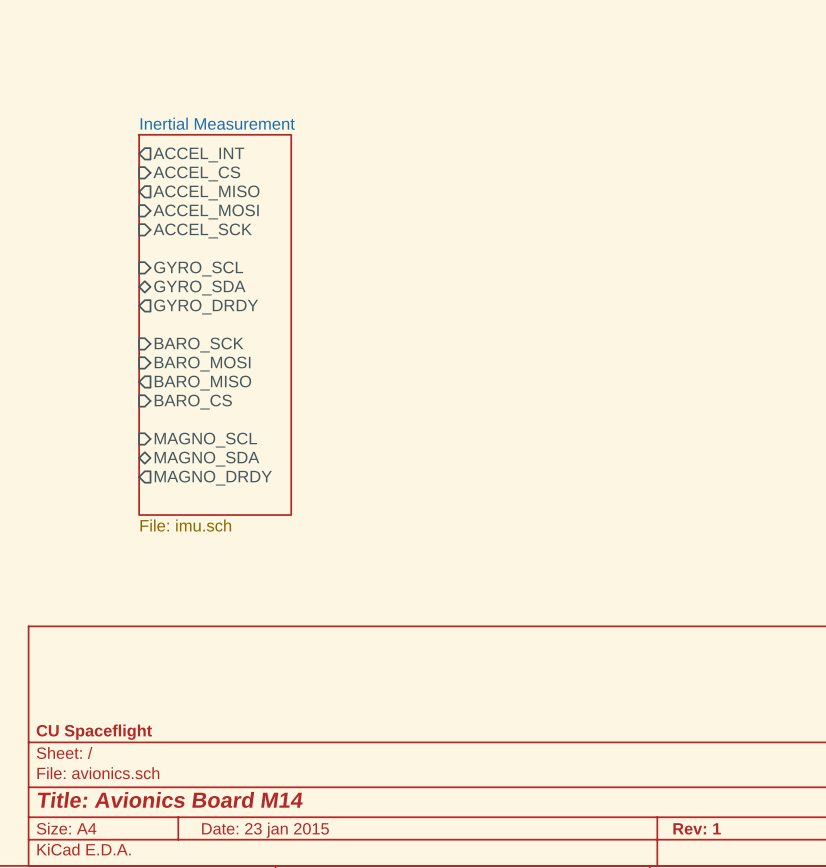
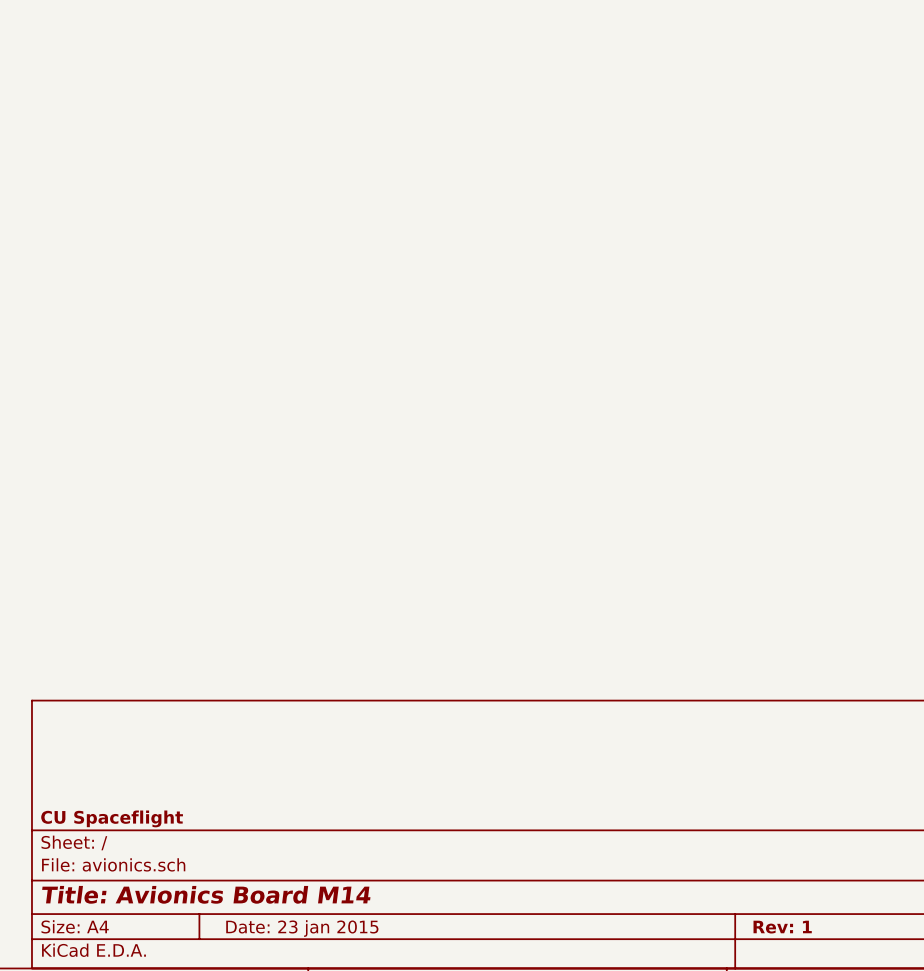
sheet pin: ACCEL_INT (198, 154) -> none
sheet pin: ACCEL_CS (196, 173) -> none
sheet pin: ACCEL_MISO (206, 192) -> none
sheet pin: ACCEL_MOSI (206, 211) -> none
sheet pin: ACCEL_SCK (202, 230) -> none
sheet pin: GYRO_SCL (198, 269) -> none
sheet pin: GYRO_SDA (199, 288) -> none
sheet pin: GYRO_DRDY (206, 307) -> none
sheet Inertial Measurement: File: imu.sch (215, 324) -> none
sheet pin: BARO_SCK (199, 345) -> none
sheet pin: BARO_MOSI (202, 364) -> none
sheet pin: BARO_MISO (202, 383) -> none
sheet pin: BARO_CS (193, 402) -> none
sheet pin: MAGNO_SCL (205, 440) -> none
sheet pin: MAGNO_SDA (207, 459) -> none
sheet pin: MAGNO_DRDY (213, 478) -> none

